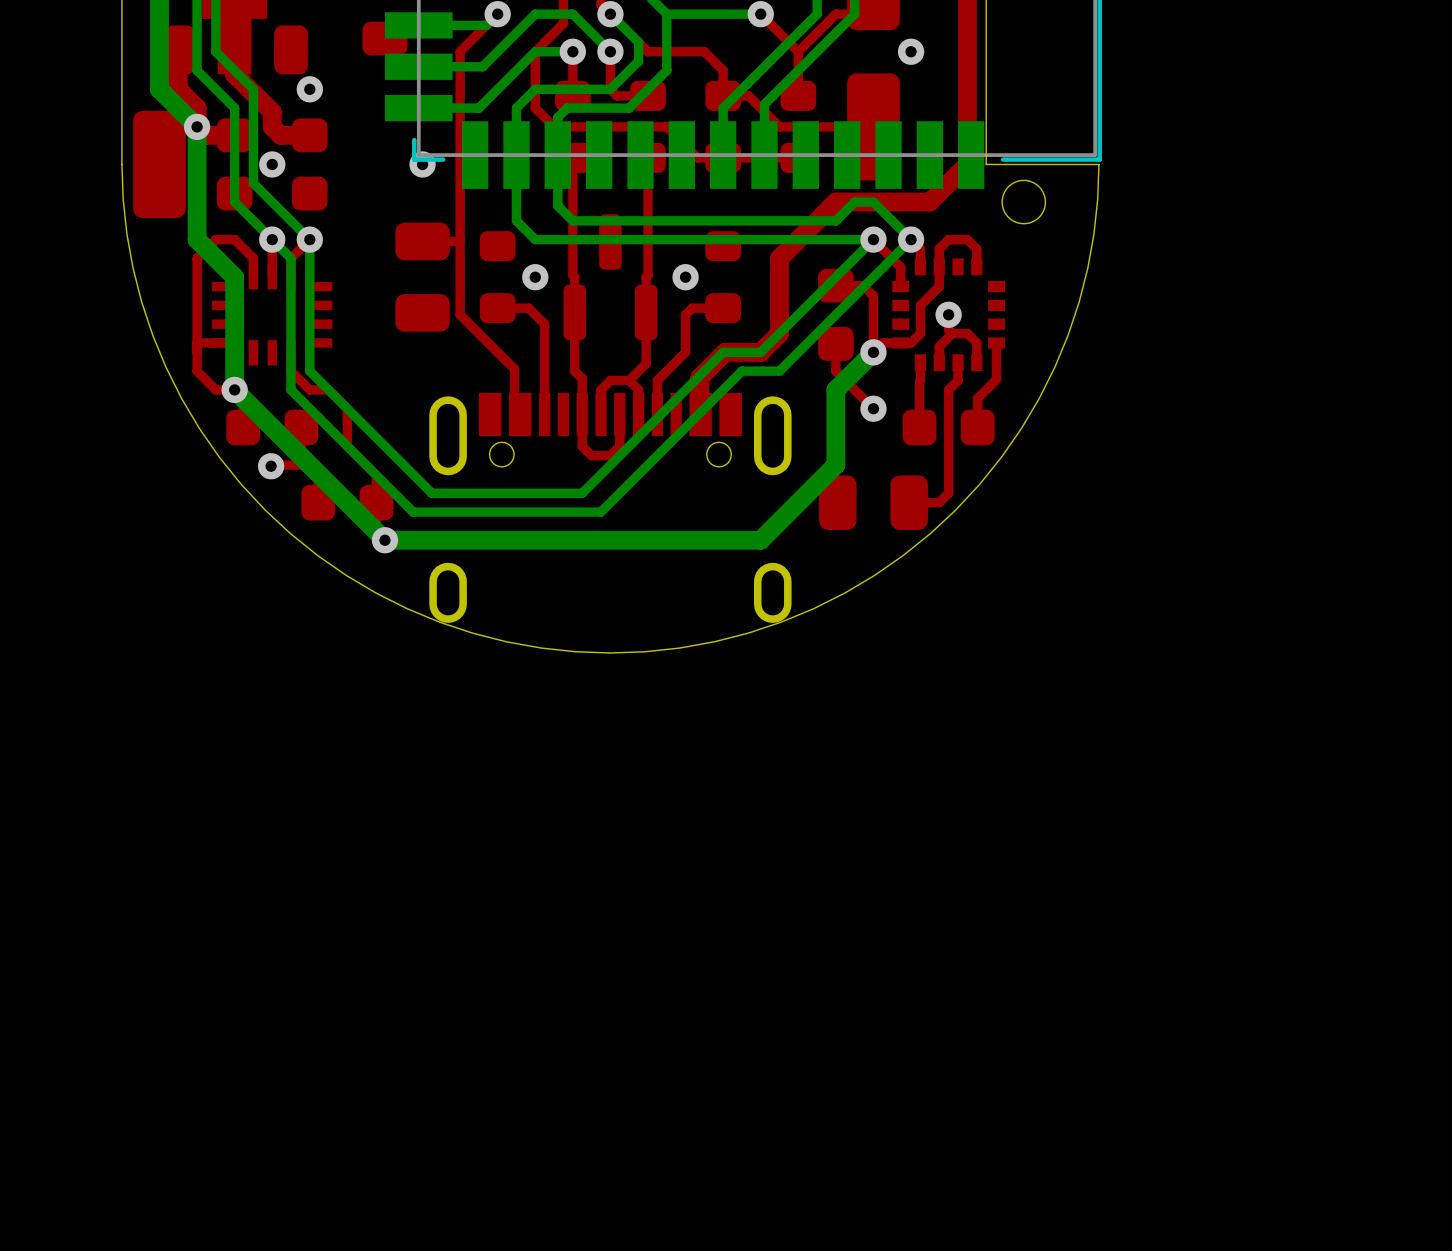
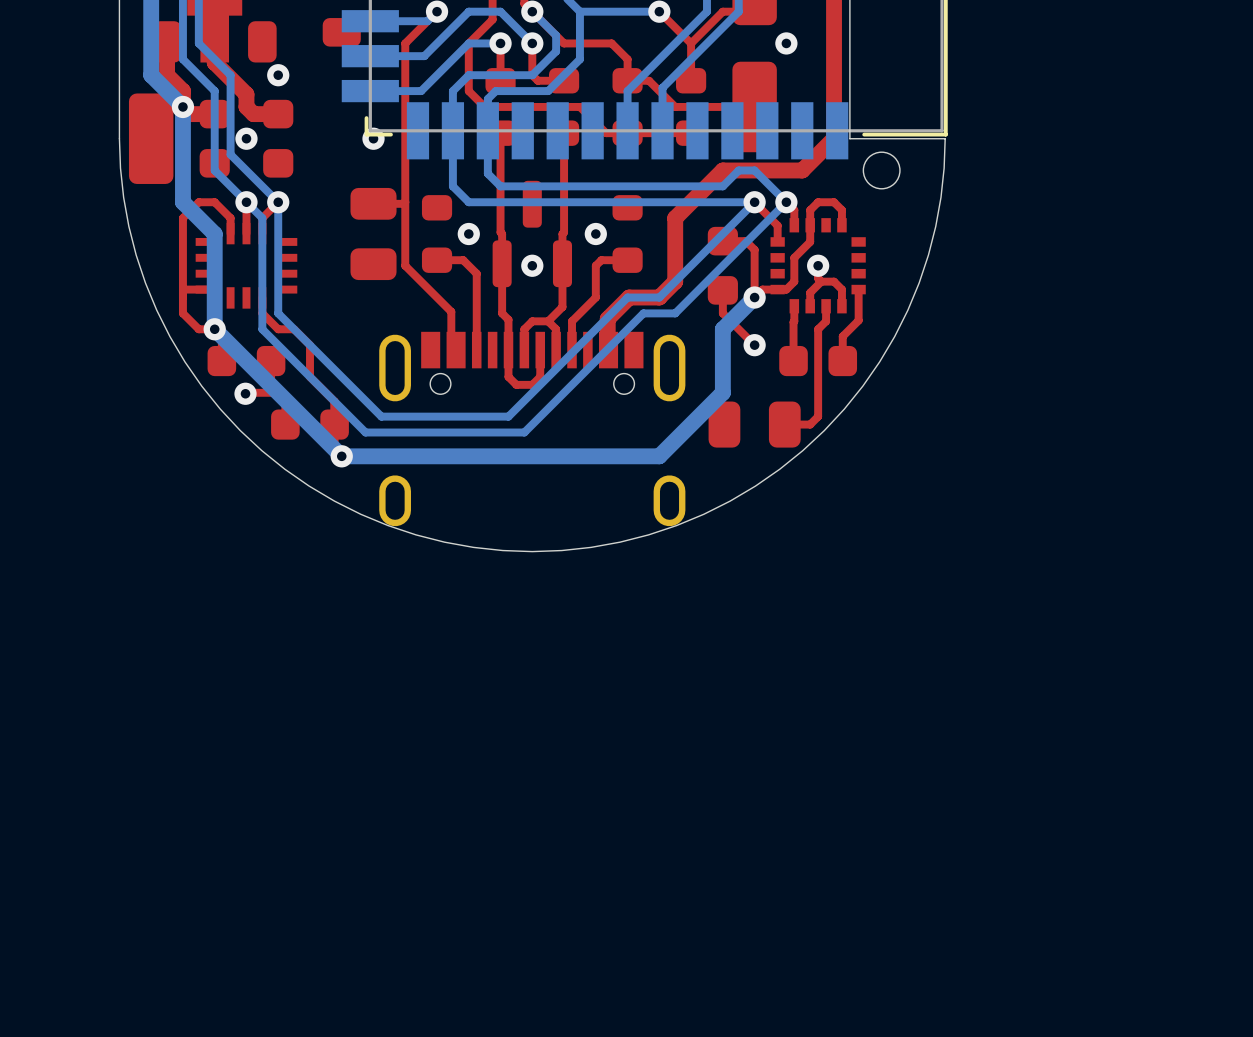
via: none -> (532, 265)

